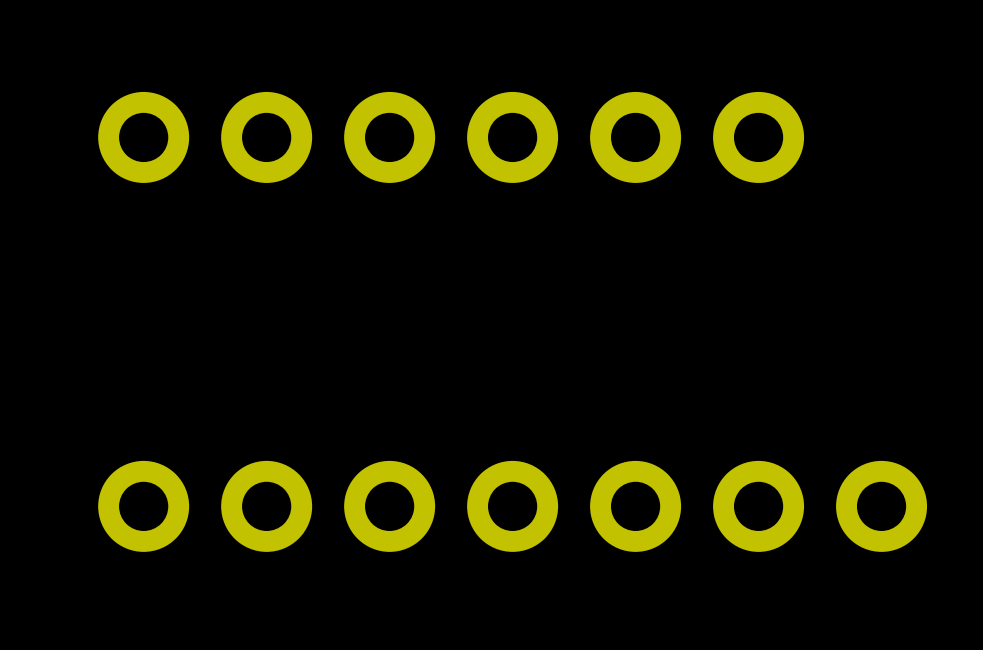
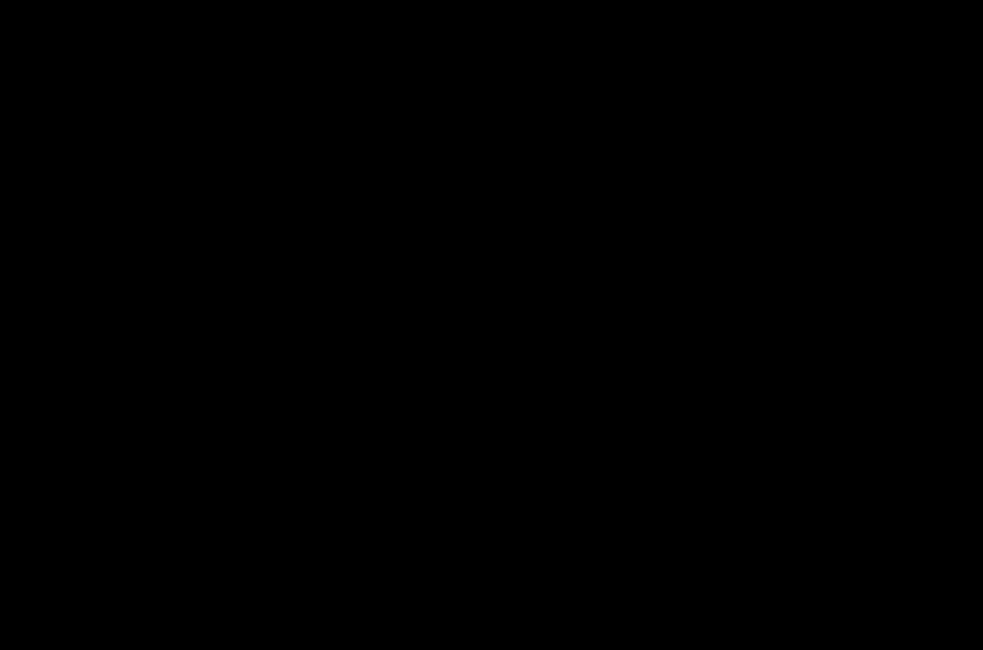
part: (451, 137) -> none
part: (512, 506) -> none

